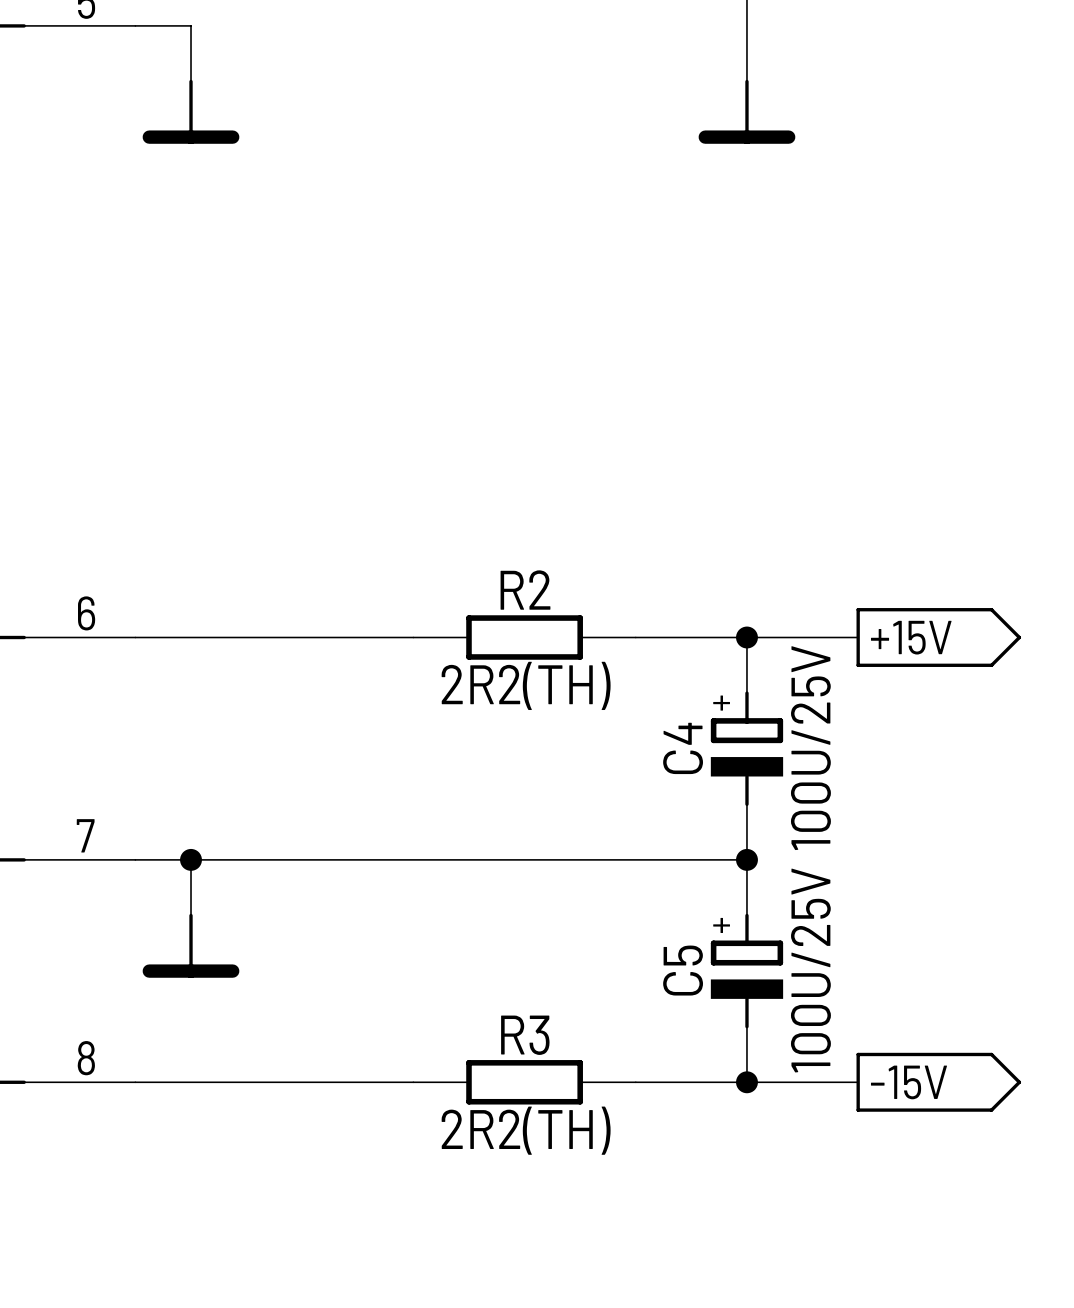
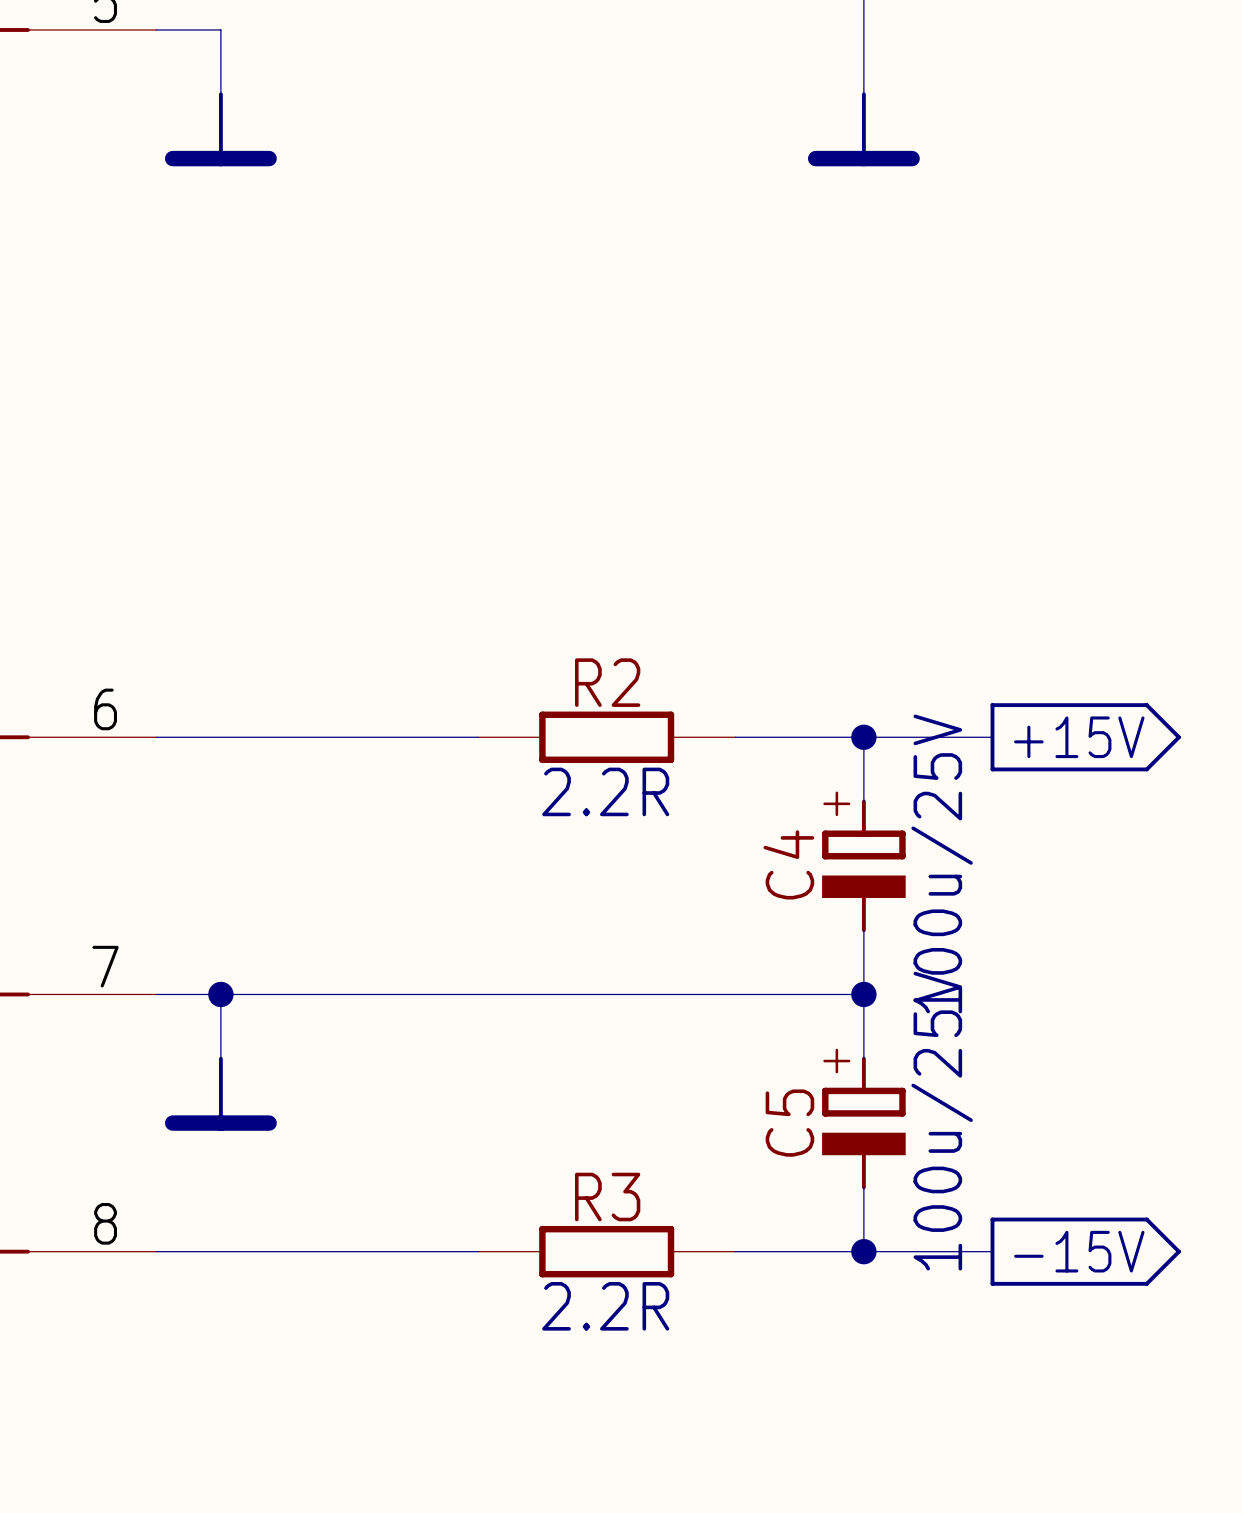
R2 value: 2R2(TH) (526, 685) -> 2.2R (605, 791)
C4 value: 100U/25V (810, 748) -> 100u/25V (942, 863)
C5 value: 100U/25V (810, 970) -> 100u/25V (942, 1121)
R3 value: 2R2(TH) (526, 1130) -> 2.2R (605, 1306)

